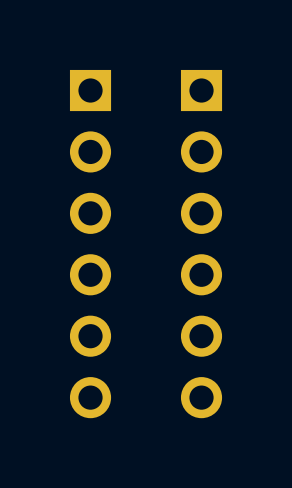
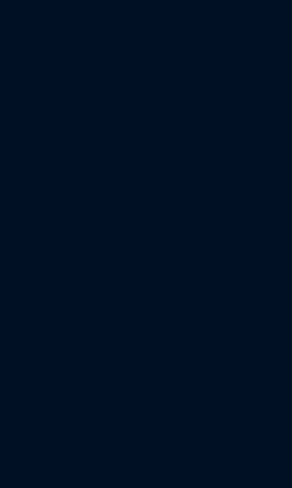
part: (90, 244) -> none
part: (201, 244) -> none

